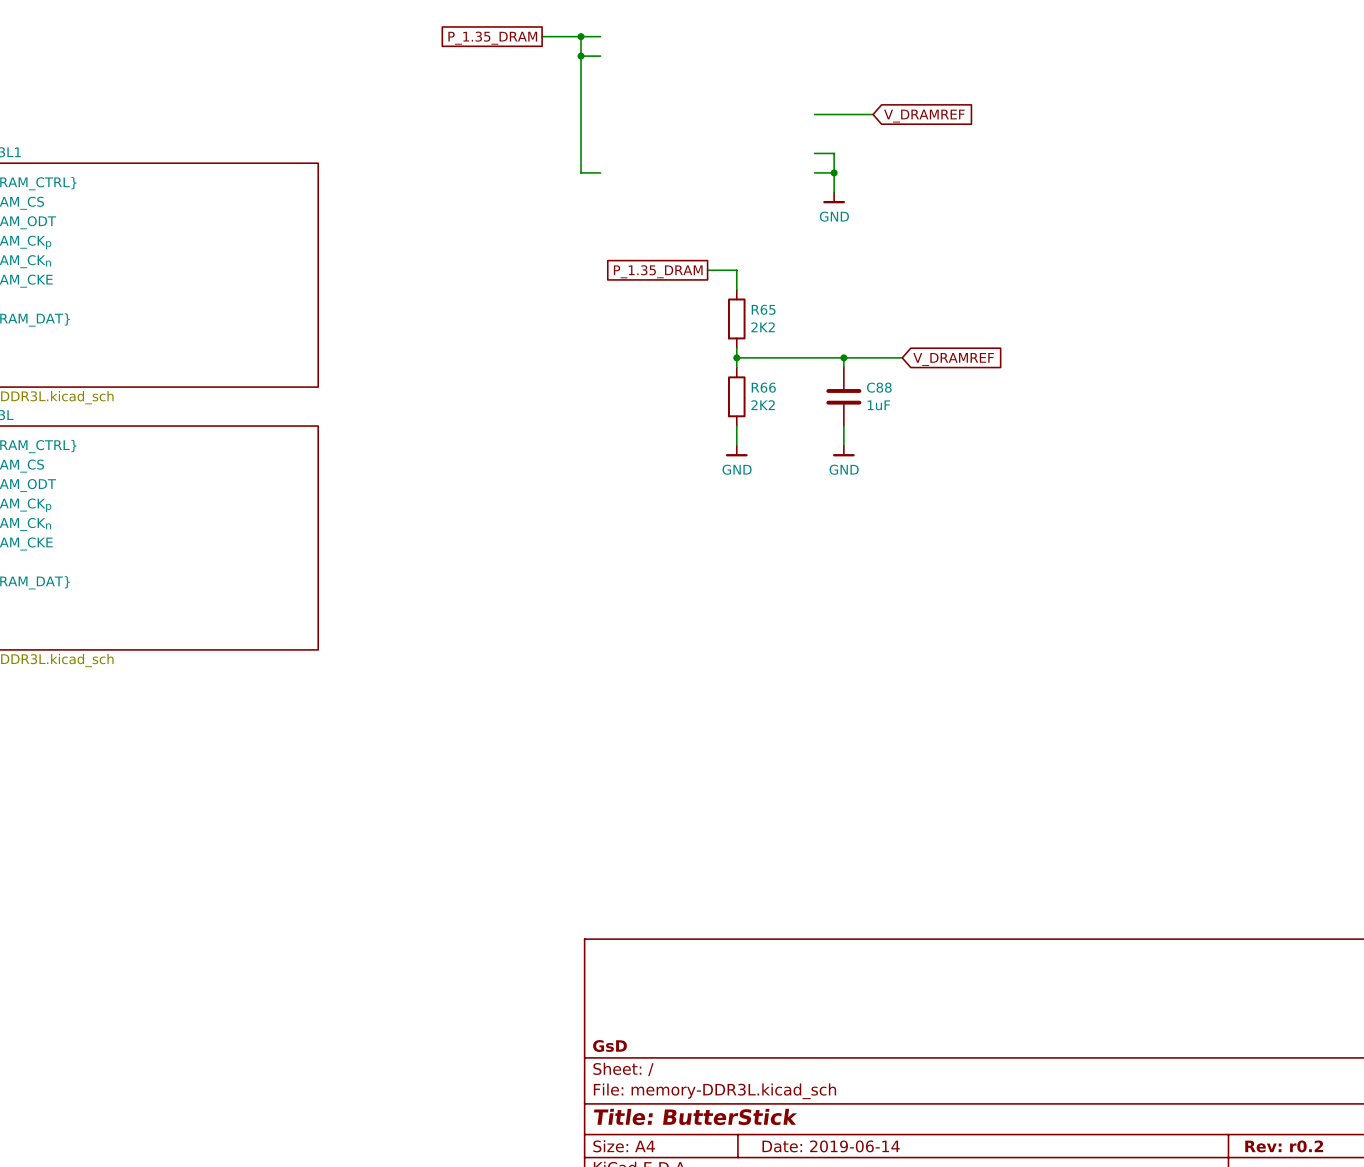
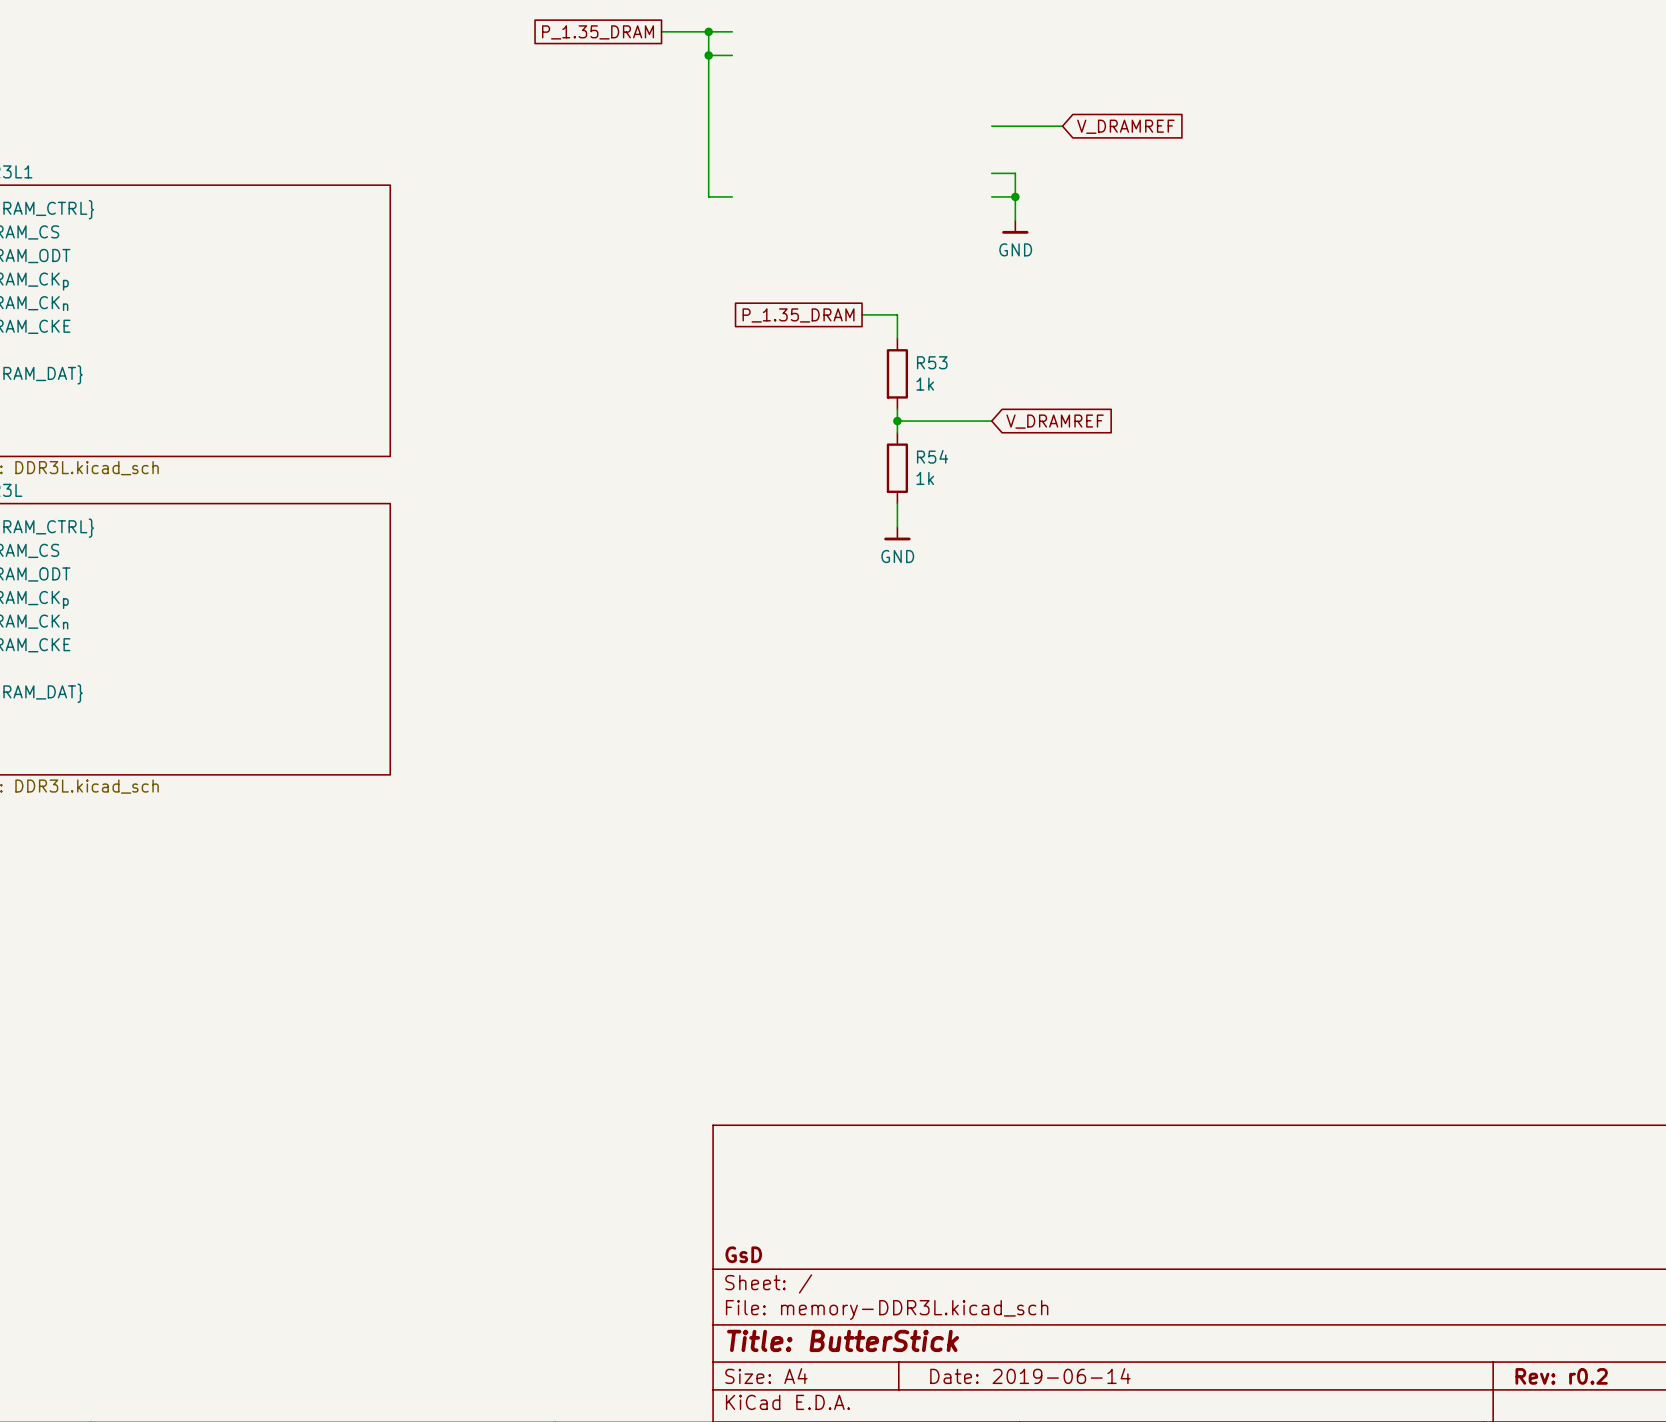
R65 name: R65 (763, 309) -> R53 (932, 362)
R65 value: 2K2 (763, 327) -> 1k (925, 384)
wire: (814, 357) (902, 357) -> none
junction: (843, 357) -> none
global label position: V_DRAMREF (953, 359) -> V_DRAMREF (1055, 421)
R66 name: R66 (763, 387) -> R54 (932, 456)
C88: 1uF (843, 396) -> none
R66 value: 2K2 (763, 405) -> 1k (925, 478)
wire: (843, 426) (843, 445) -> none
power symbol: GND (843, 450) -> none

